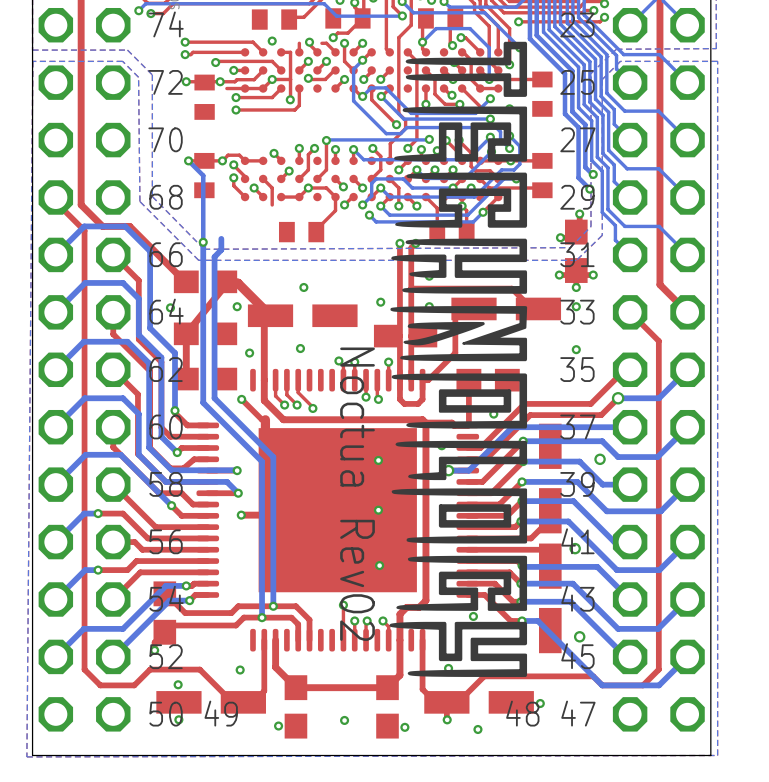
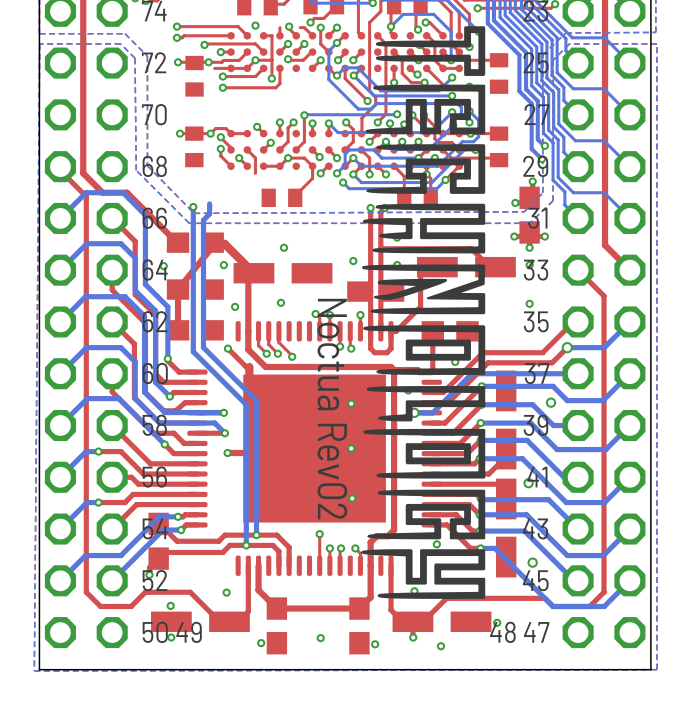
bottom track: (188, 160) (203, 175) (203, 242) -> none

